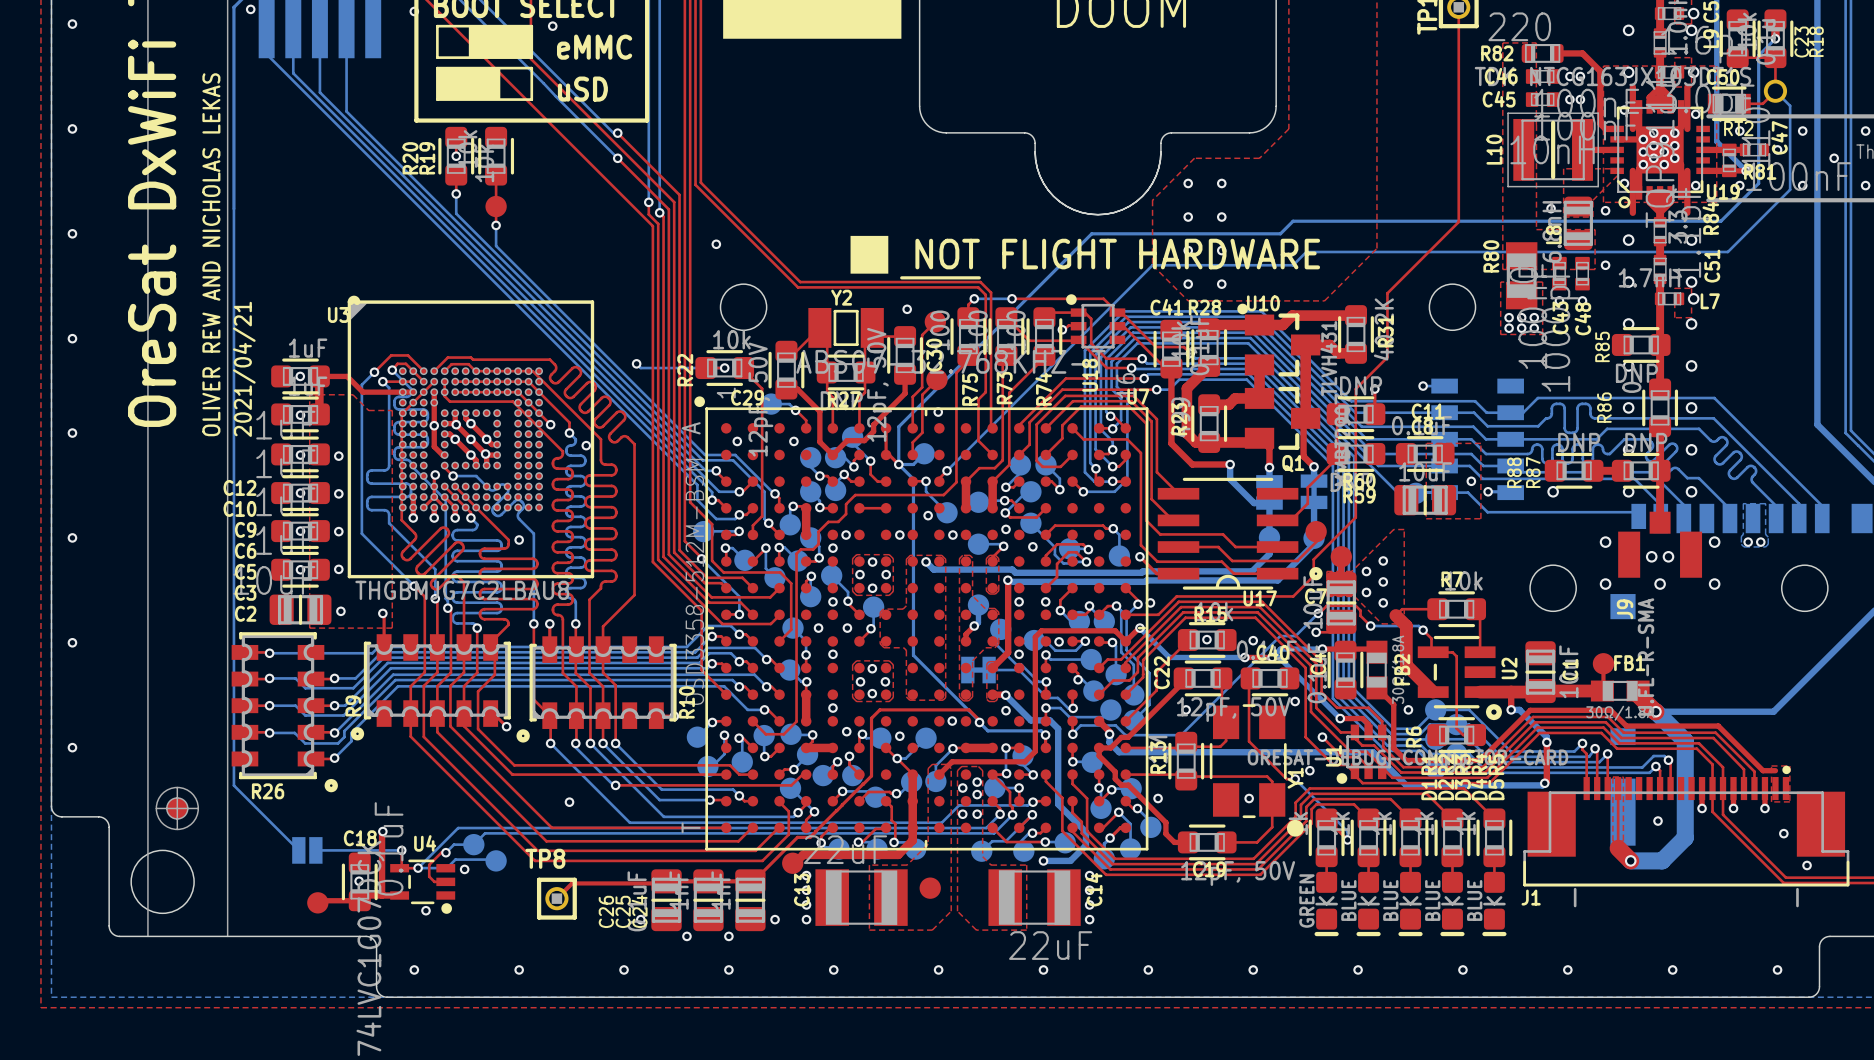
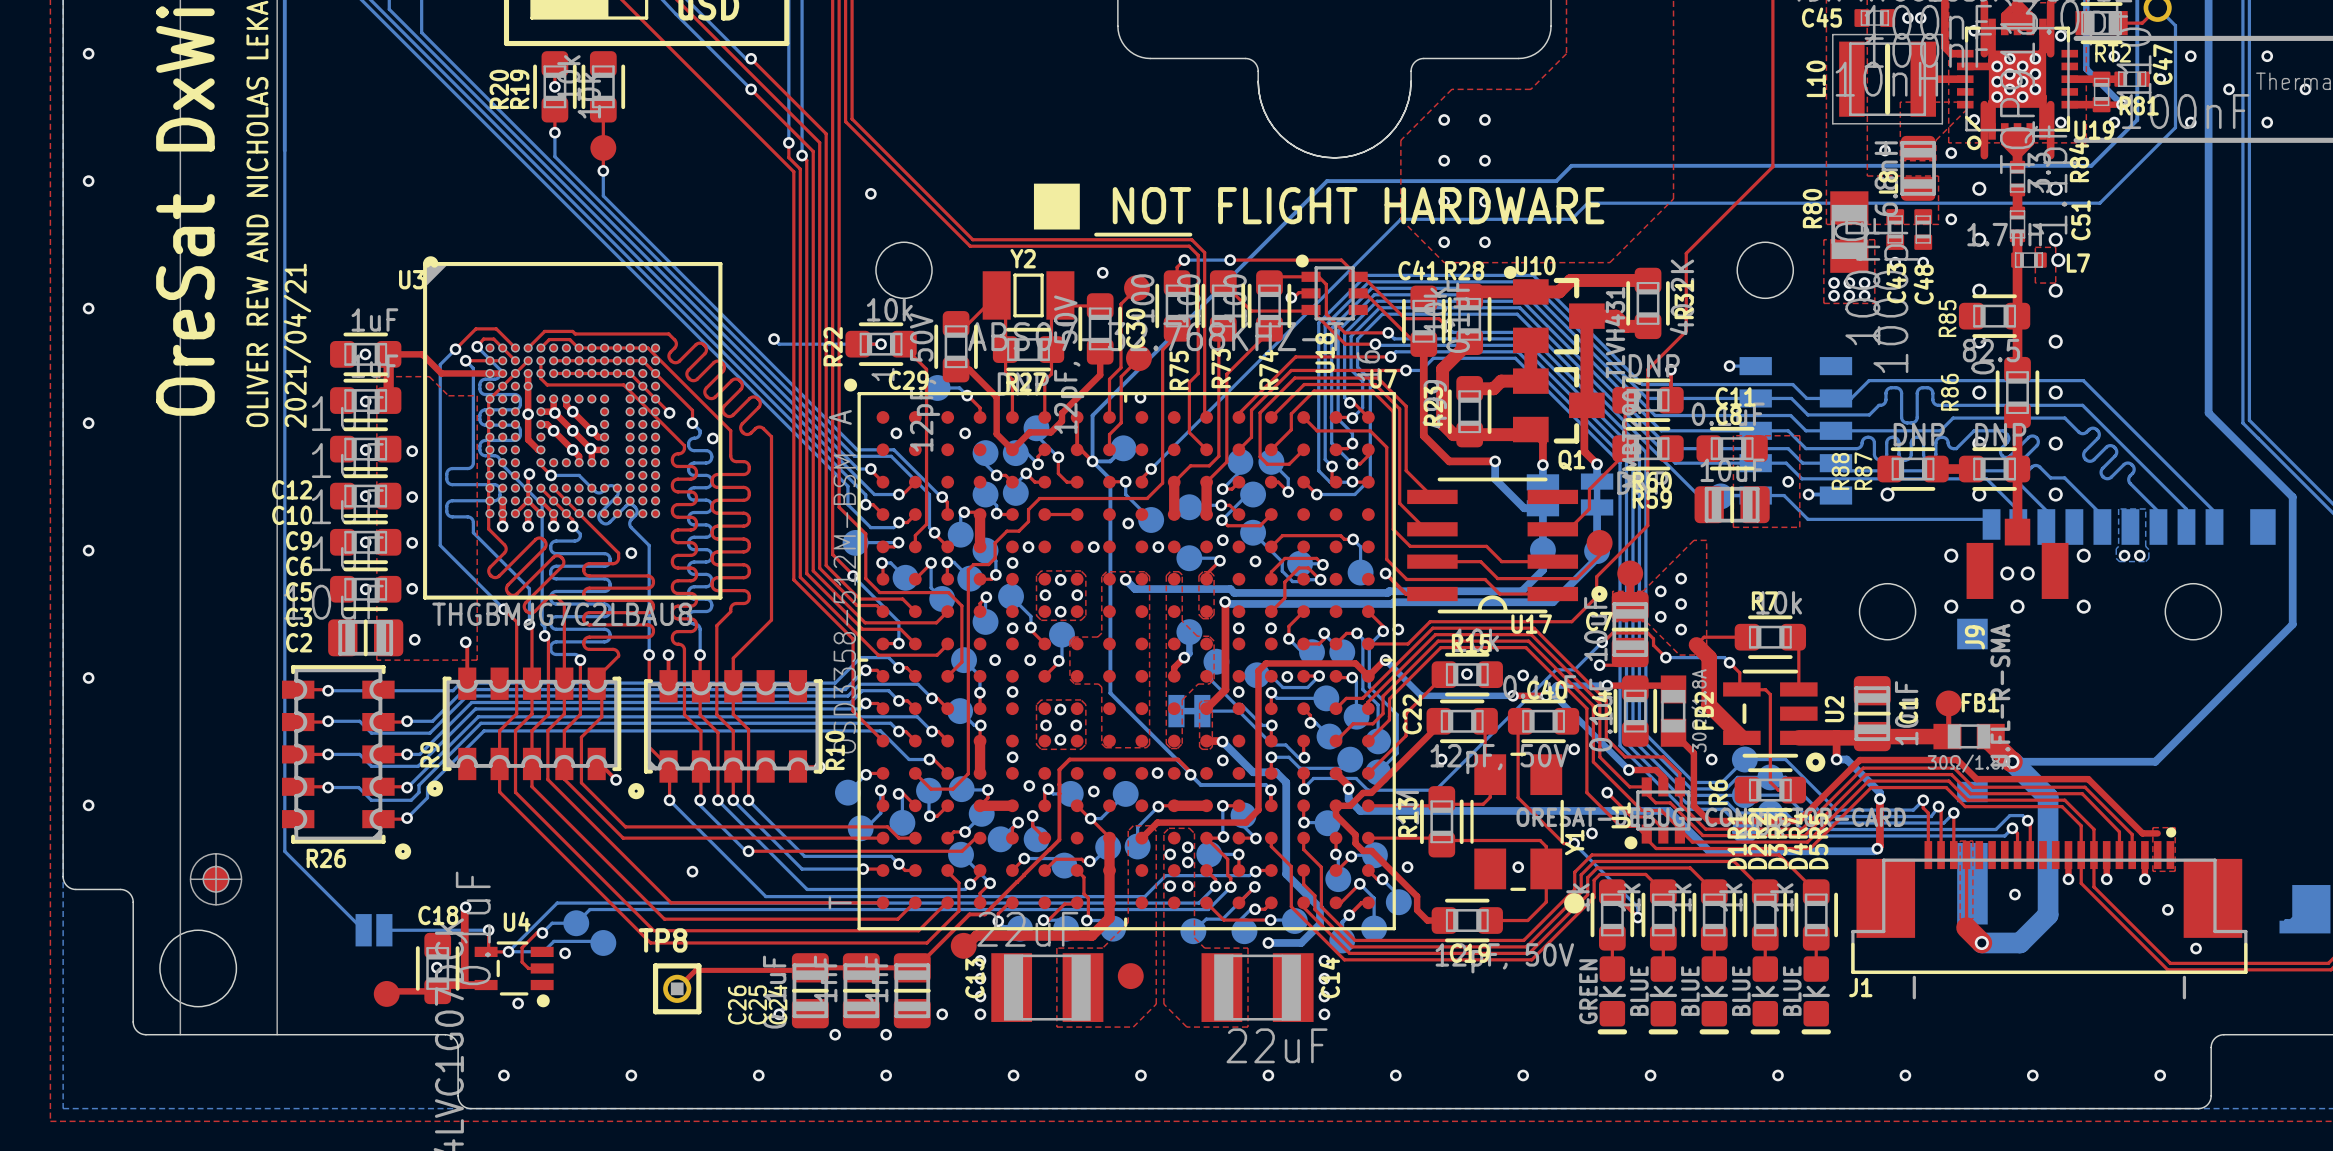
R85 value: DNP (1636, 373) -> 82.5 (1991, 350)

